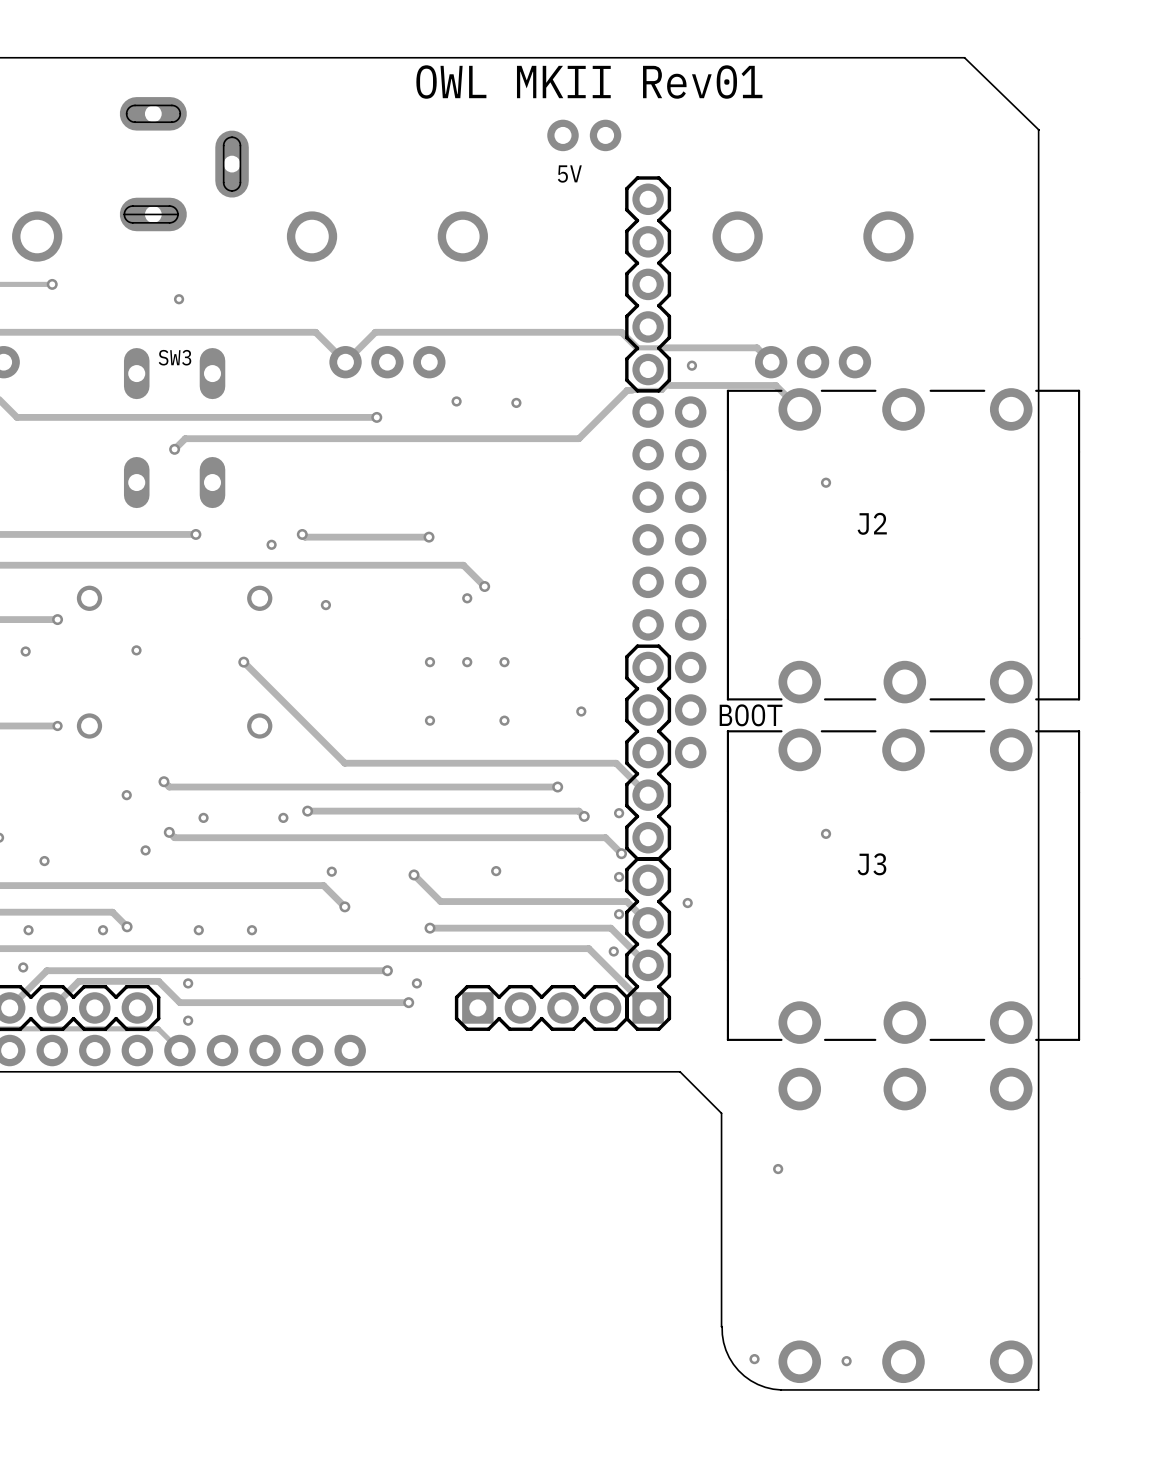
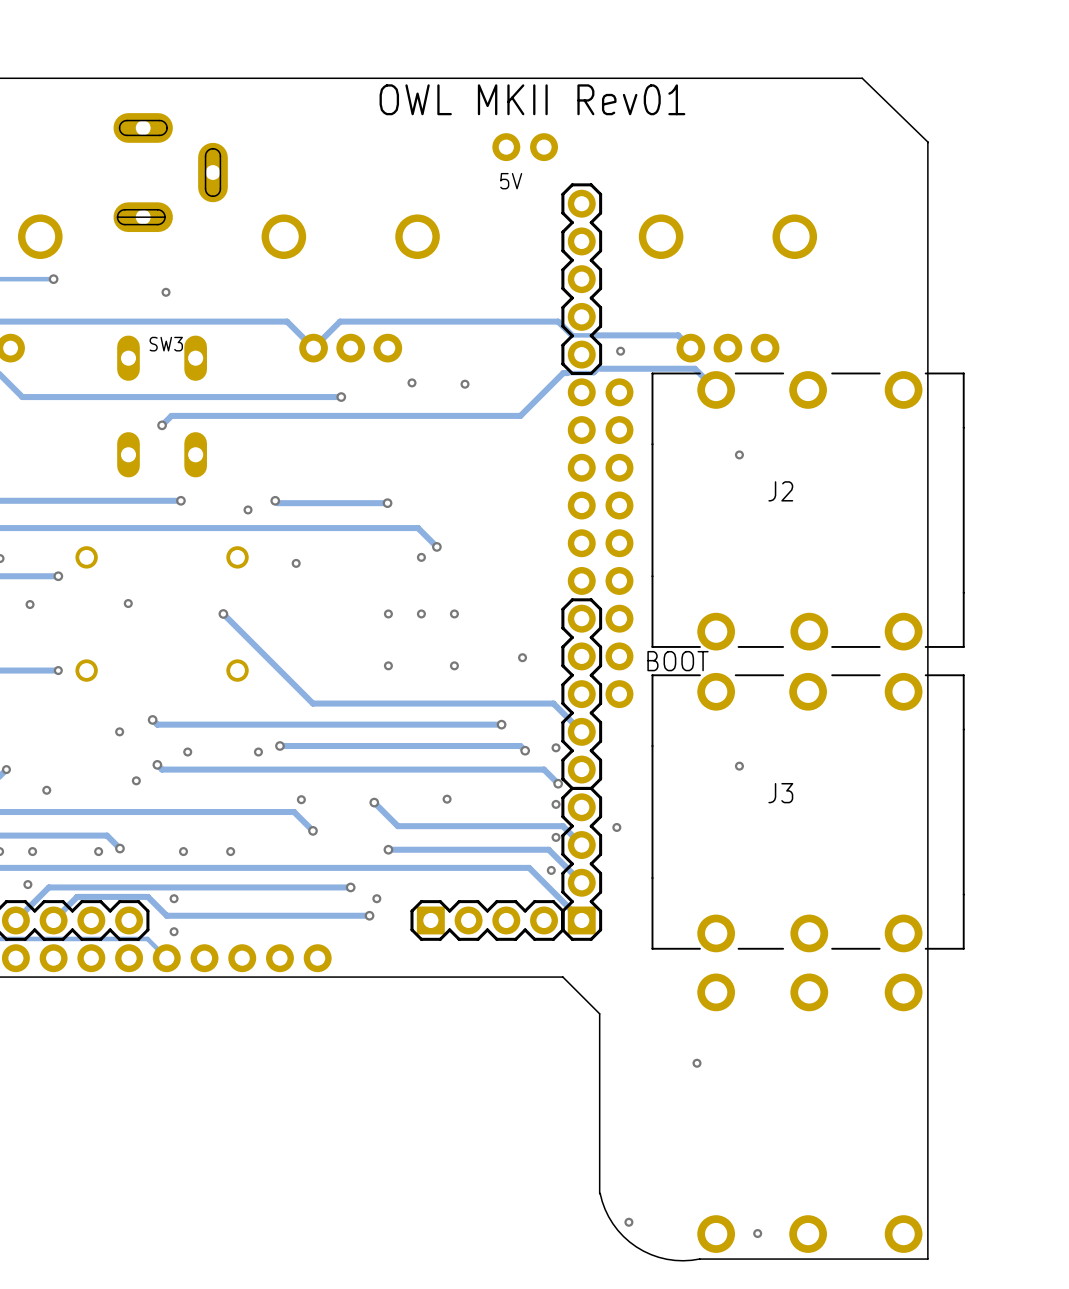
board edge: (626, 1071) (680, 1071) (721, 1113) (721, 1326) (723, 1342) (729, 1357) (744, 1376) (765, 1387) (781, 1389) -> (562, 977) (599, 1013) (599, 1193) (608, 1216) (617, 1230) (629, 1242) (650, 1254) (674, 1260) (699, 1259)
via position: (754, 1359) -> (628, 1222)

